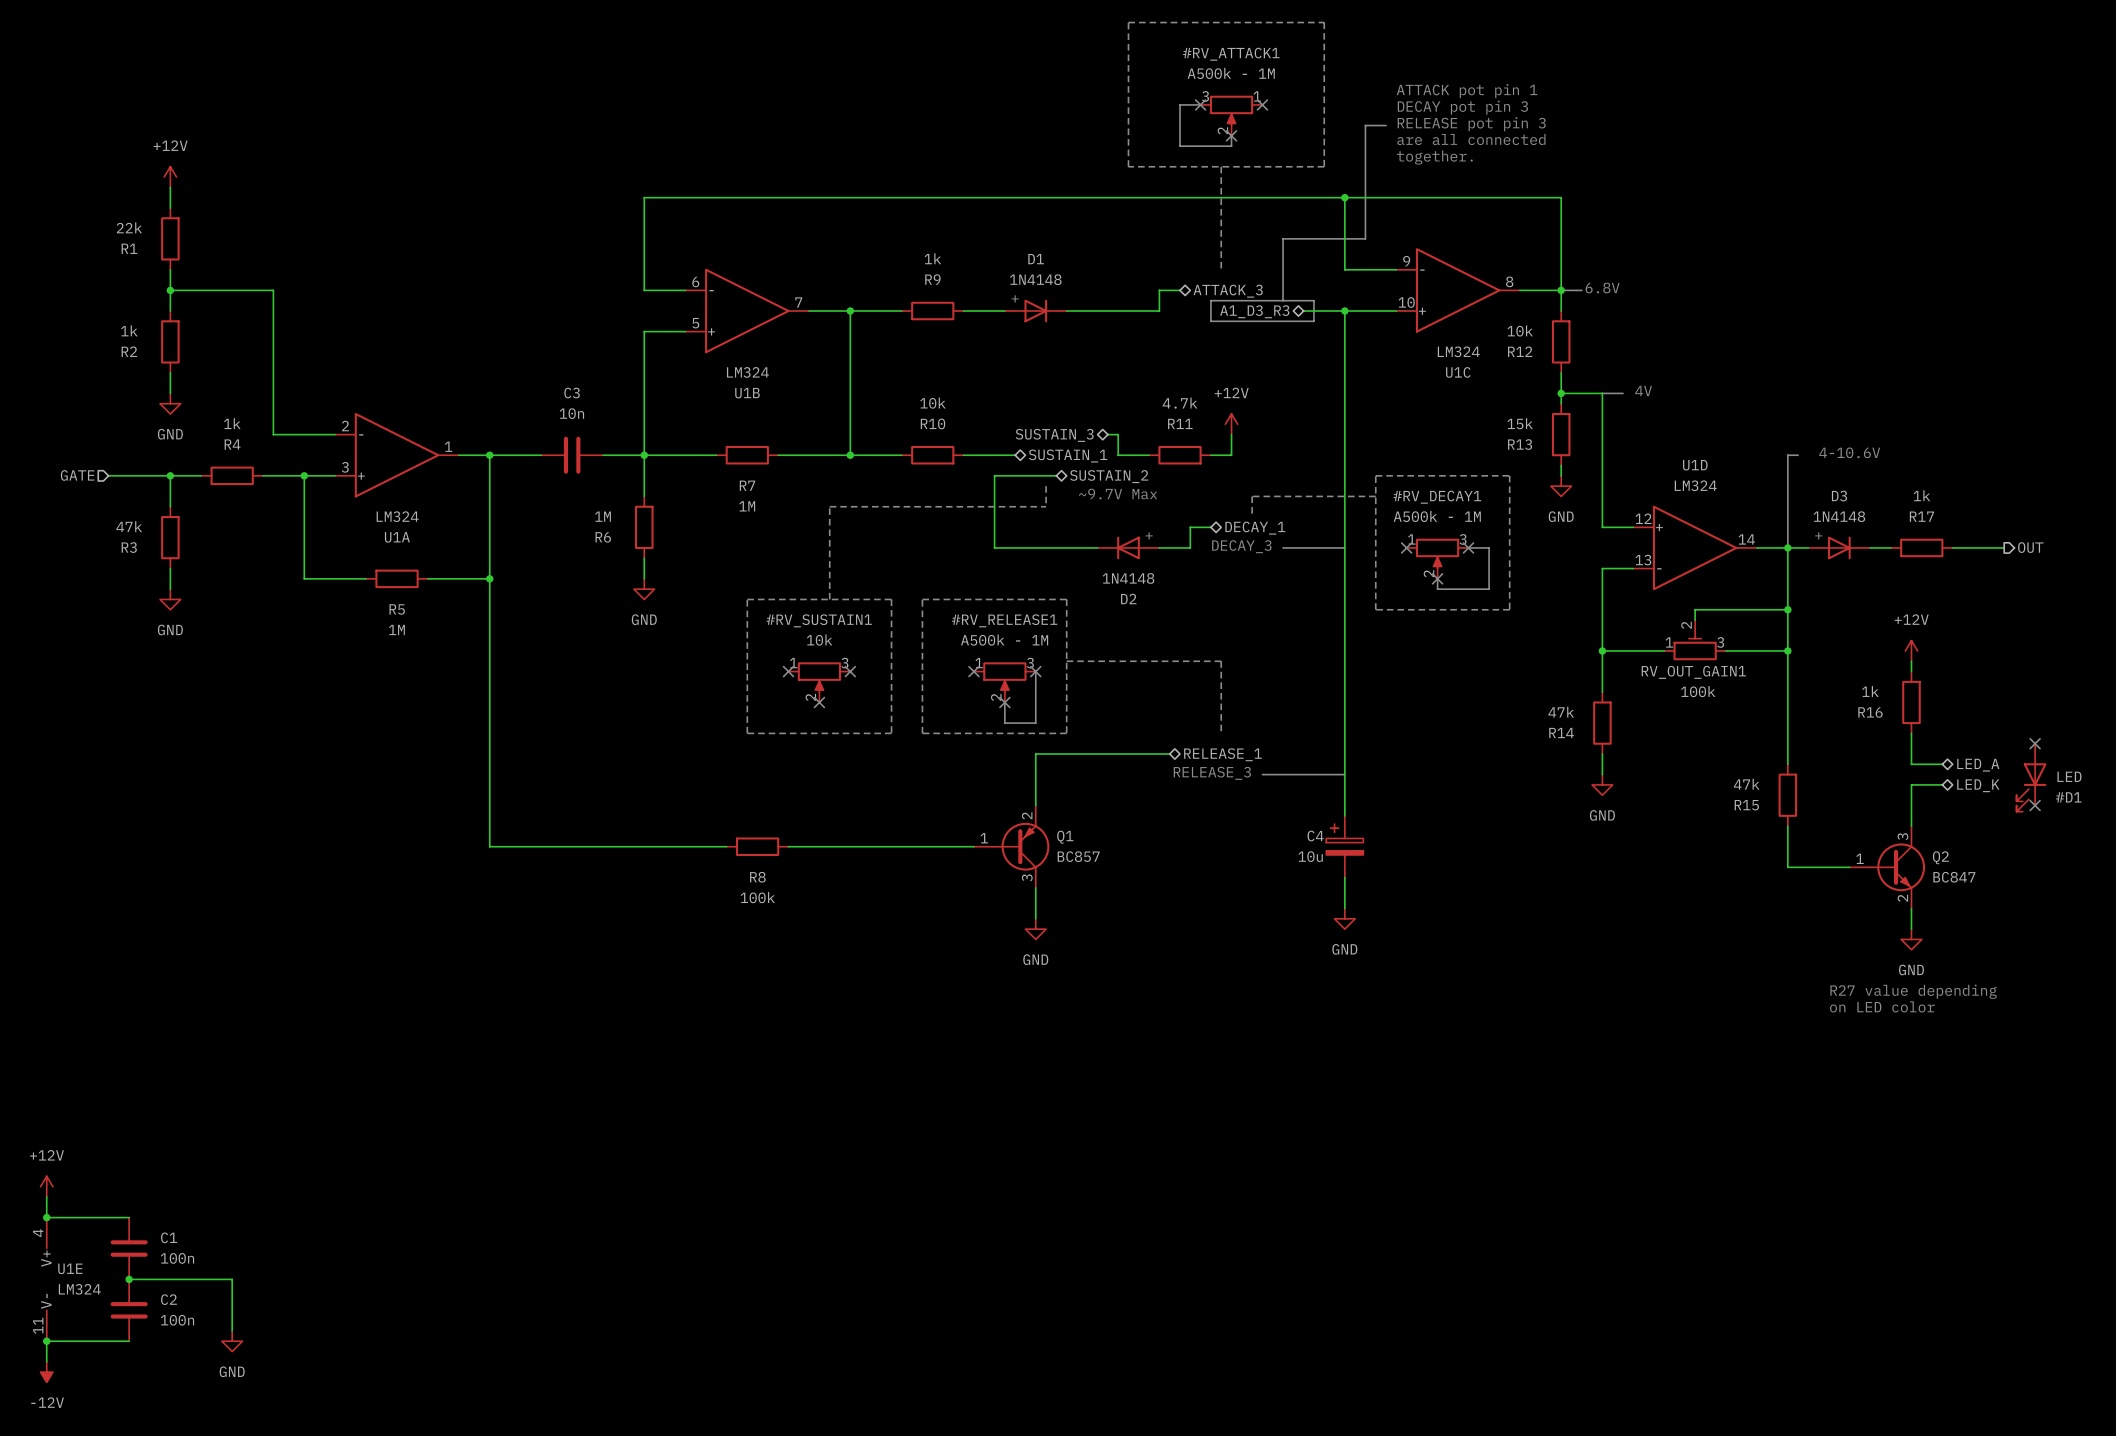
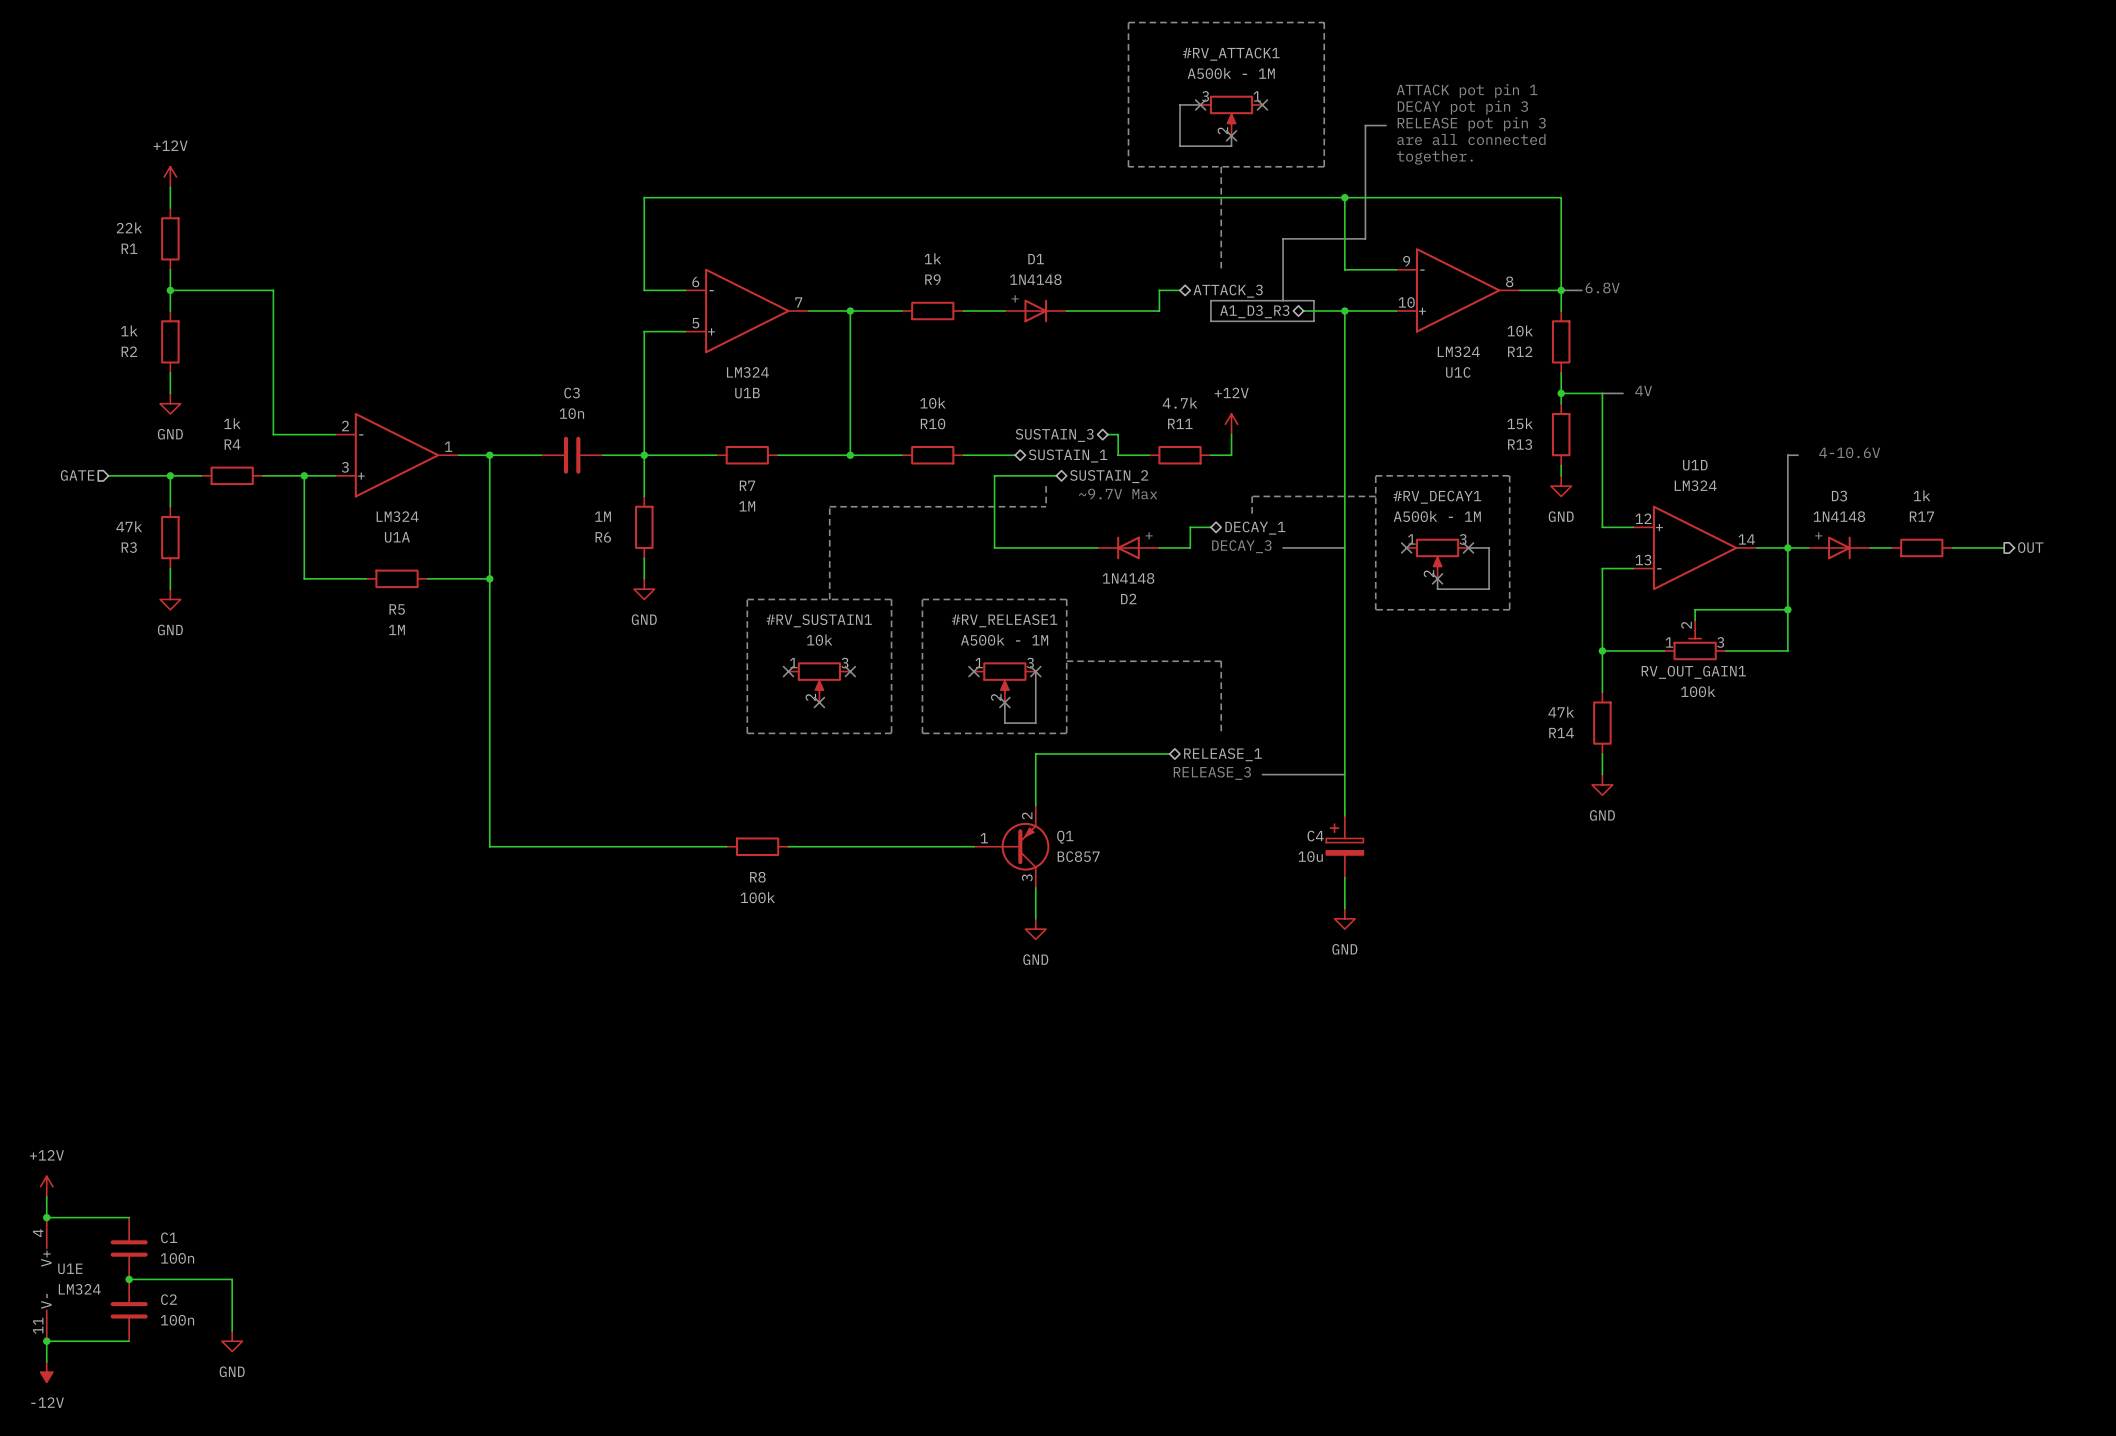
wire: (1787, 650) (1787, 764) -> none
junction: (1787, 650) -> none
power symbol: +12V (1911, 650) -> none
wire: (1911, 661) (1911, 671) -> none
R16: 1k (1911, 702) -> none
wire: (1911, 733) (1911, 764) (1942, 764) -> none
no-connect mark: (2035, 743) -> none
hierarchical label: LED_A (1978, 765) -> none
#D1: LED (2031, 777) -> none
wire: (1942, 784) (1911, 784) (1911, 826) -> none
hierarchical label: LED_K (1978, 785) -> none
R15: 47k (1787, 795) -> none
no-connect mark: (2035, 805) -> none
wire: (1787, 826) (1787, 867) (1849, 867) -> none
Q2: BC847 (1887, 867) -> none
wire: (1911, 908) (1911, 929) -> none
power symbol: GND (1911, 939) -> none
text: R27 value depending (1913, 991) -> none
text: on LED color (1882, 1006) -> none

